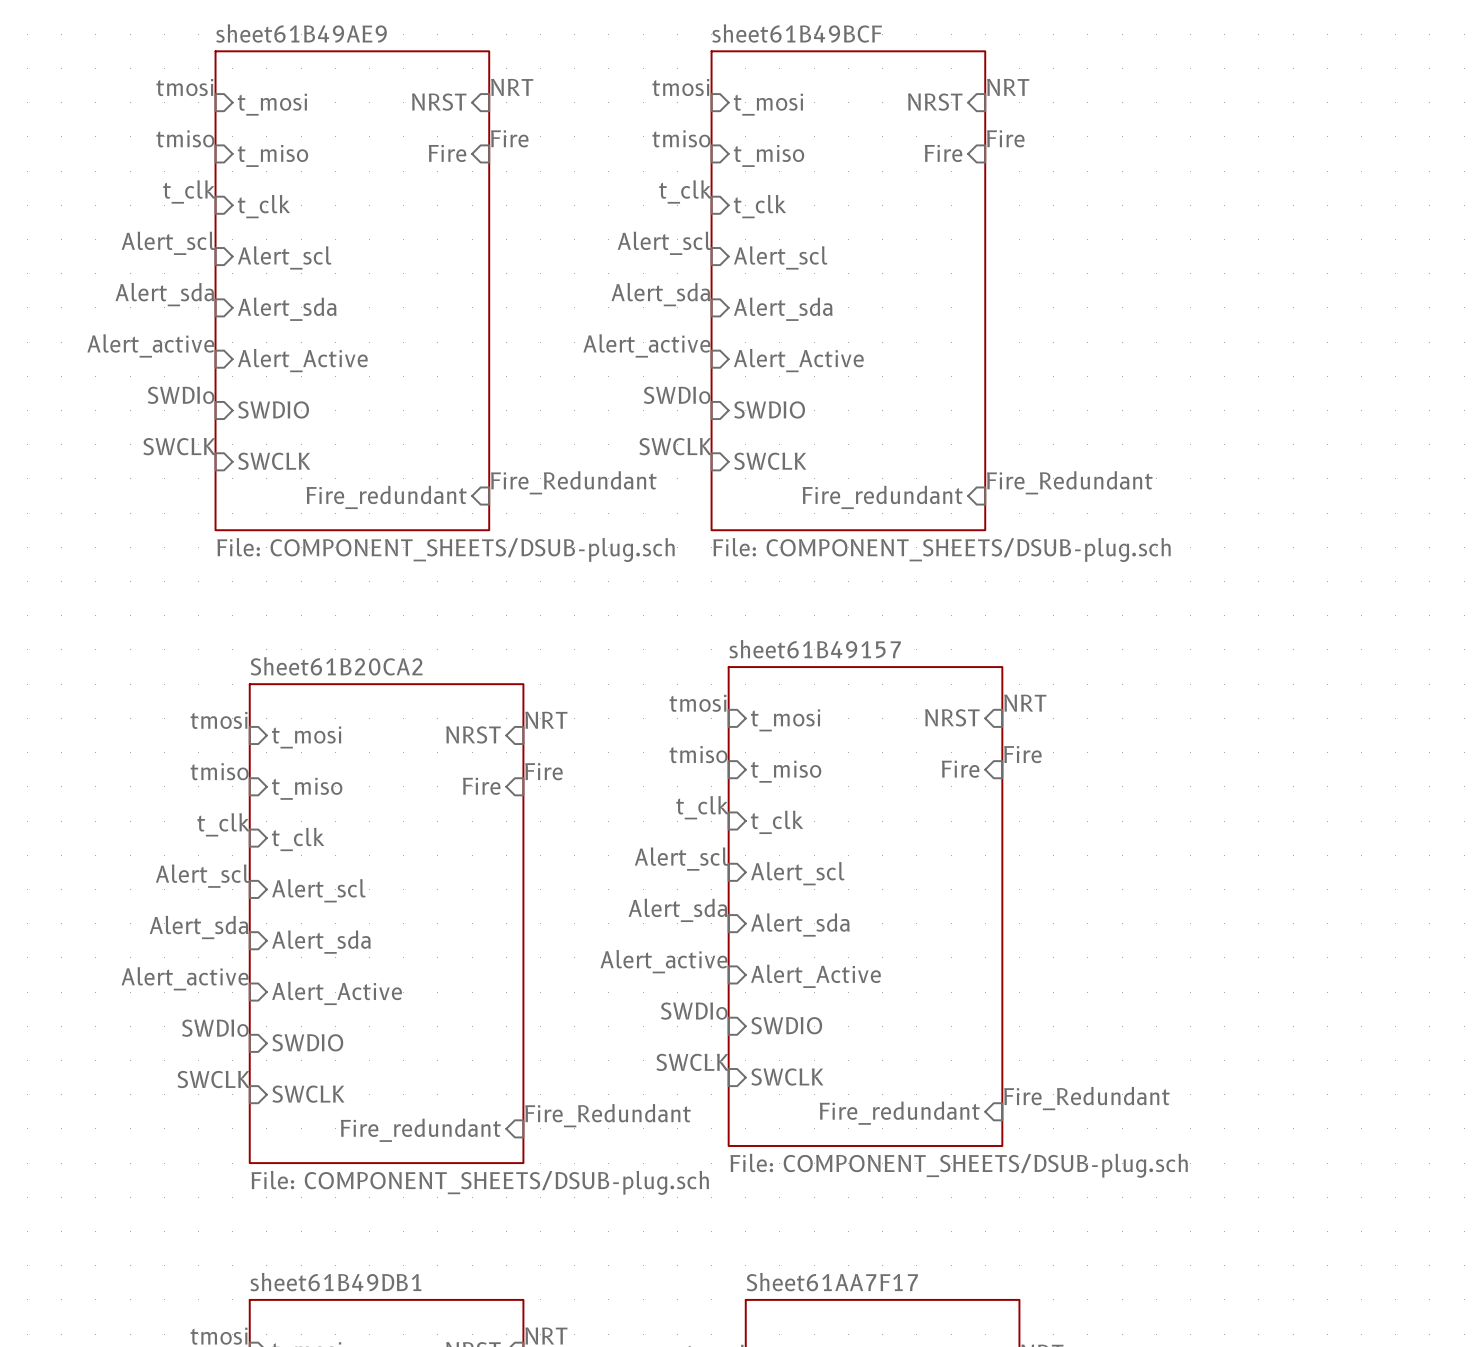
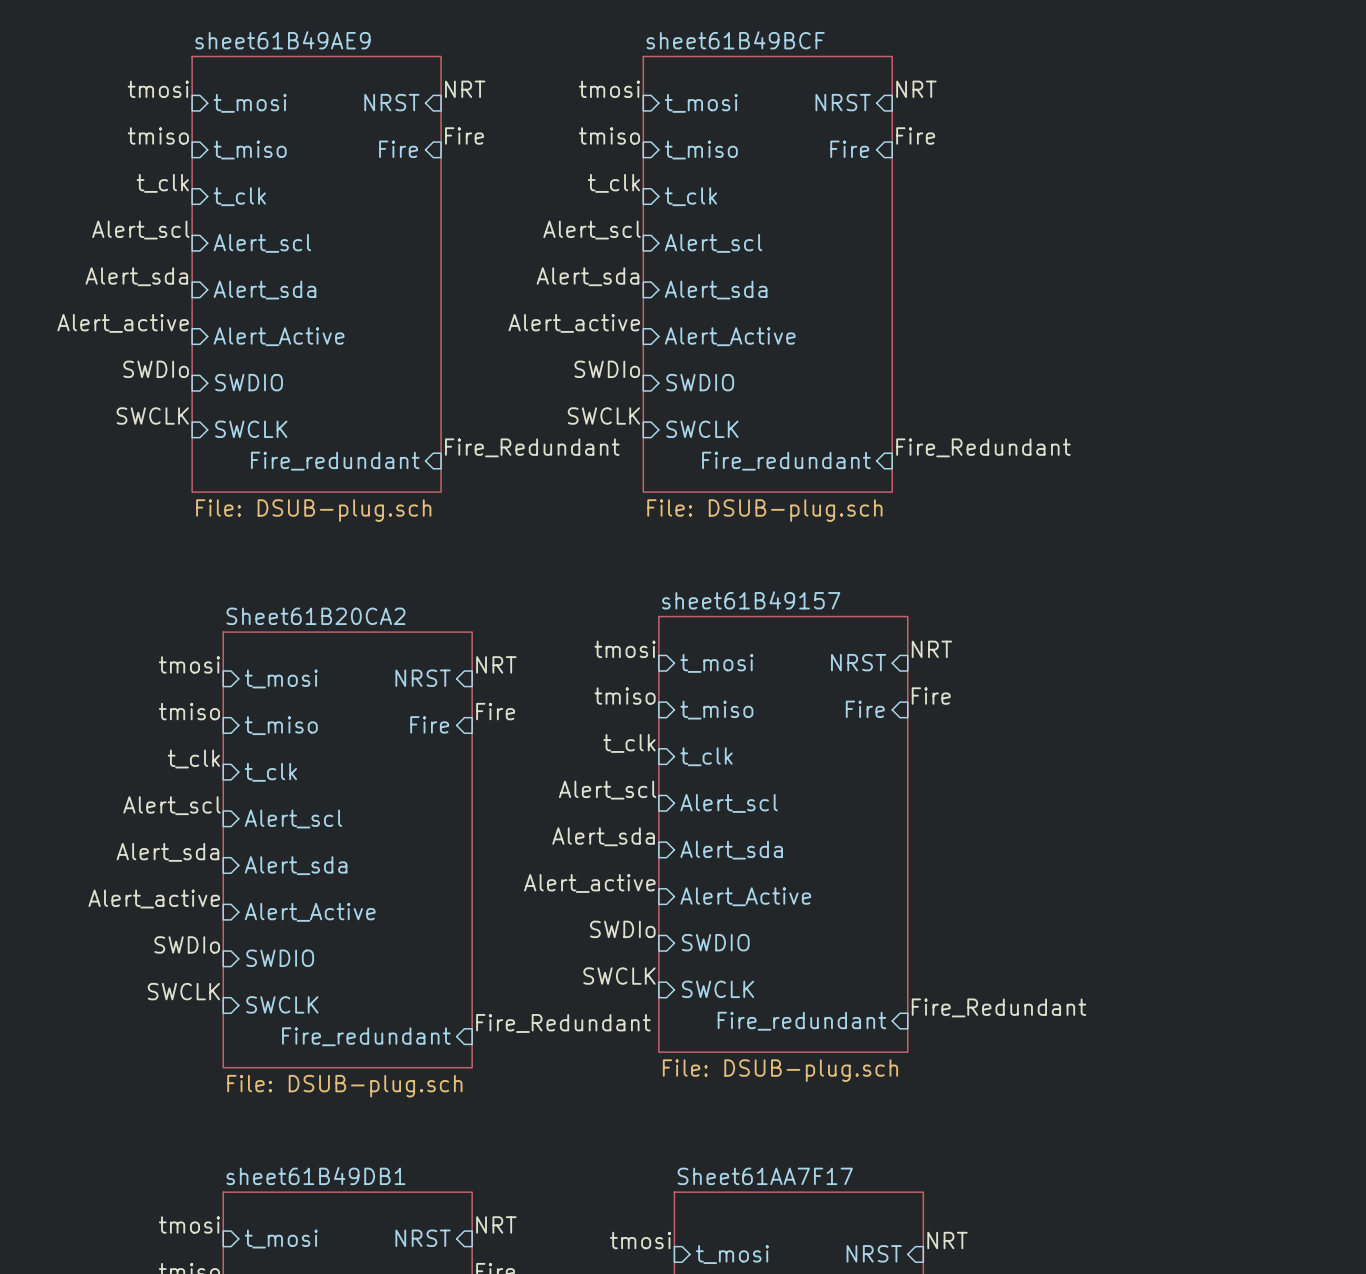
sheet sheet61B49AE9 value: File: COMPONENT_SHEETS/DSUB-plug.sch (445, 550) -> File: DSUB-plug.sch (313, 510)
sheet sheet61B49BCF value: File: COMPONENT_SHEETS/DSUB-plug.sch (942, 550) -> File: DSUB-plug.sch (764, 510)
sheet sheet61B49157 value: File: COMPONENT_SHEETS/DSUB-plug.sch (959, 1165) -> File: DSUB-plug.sch (780, 1070)
sheet Sheet61B20CA2 value: File: COMPONENT_SHEETS/DSUB-plug.sch (480, 1182) -> File: DSUB-plug.sch (344, 1086)

